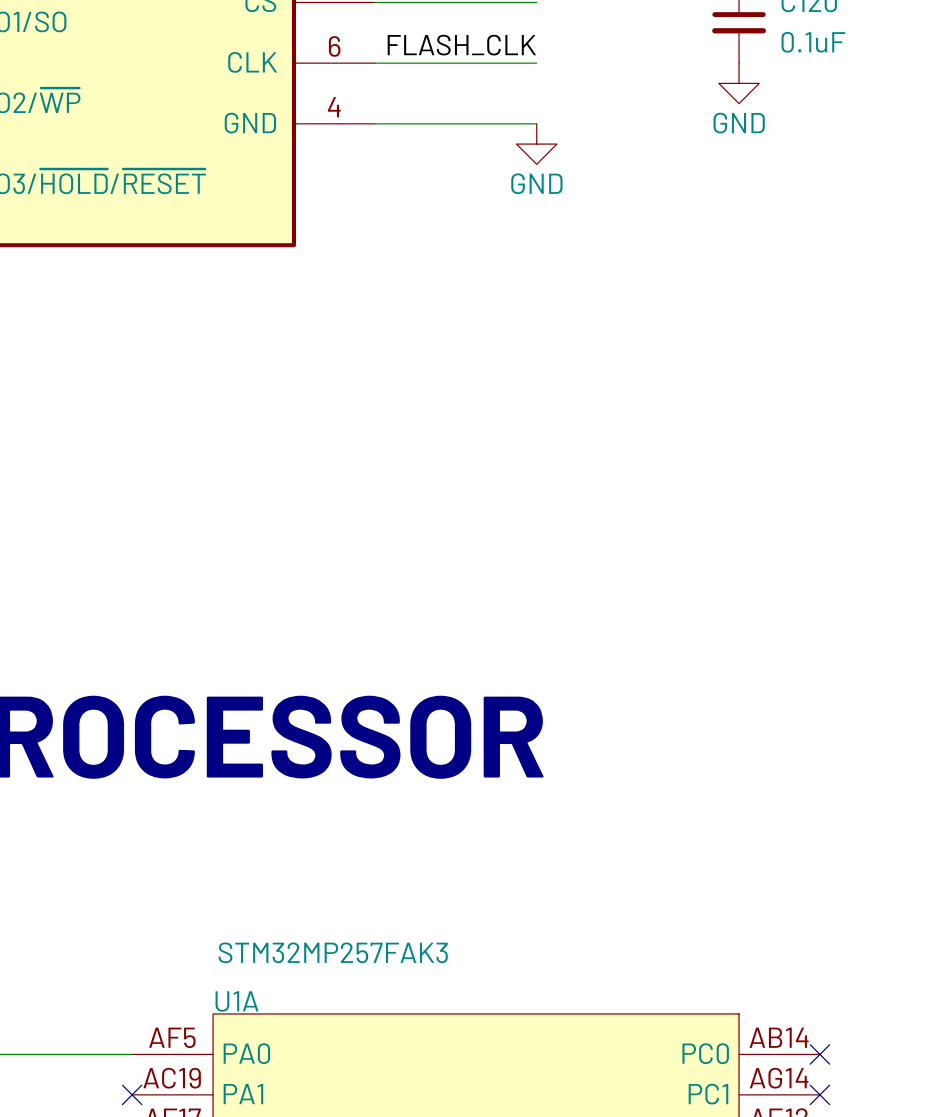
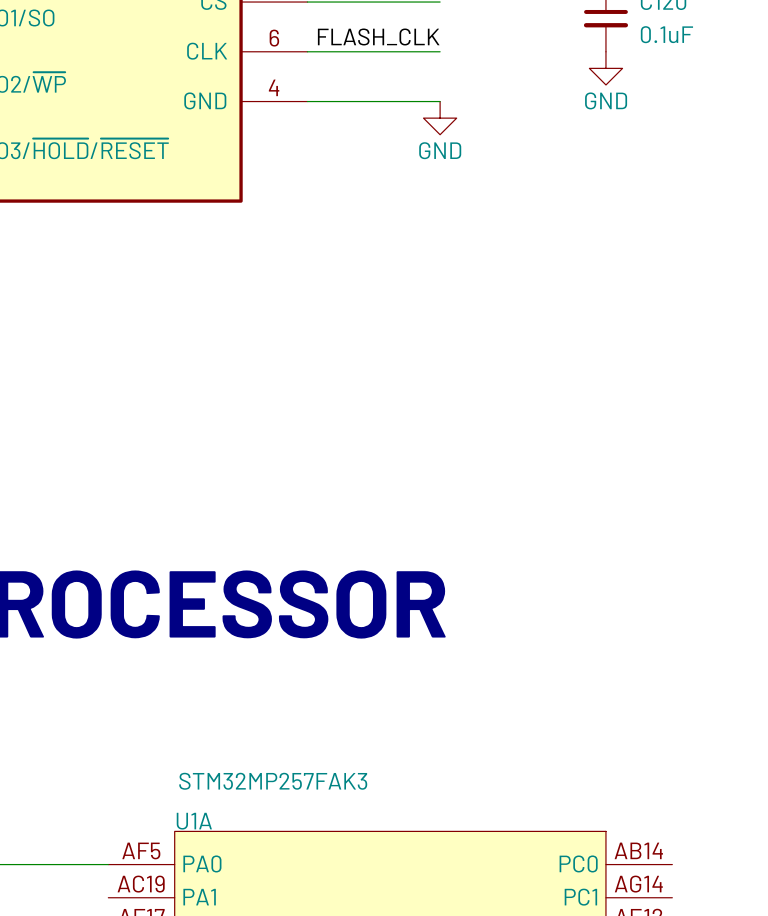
no-connect mark: (819, 1054) -> none
no-connect mark: (132, 1094) -> none
no-connect mark: (819, 1094) -> none

